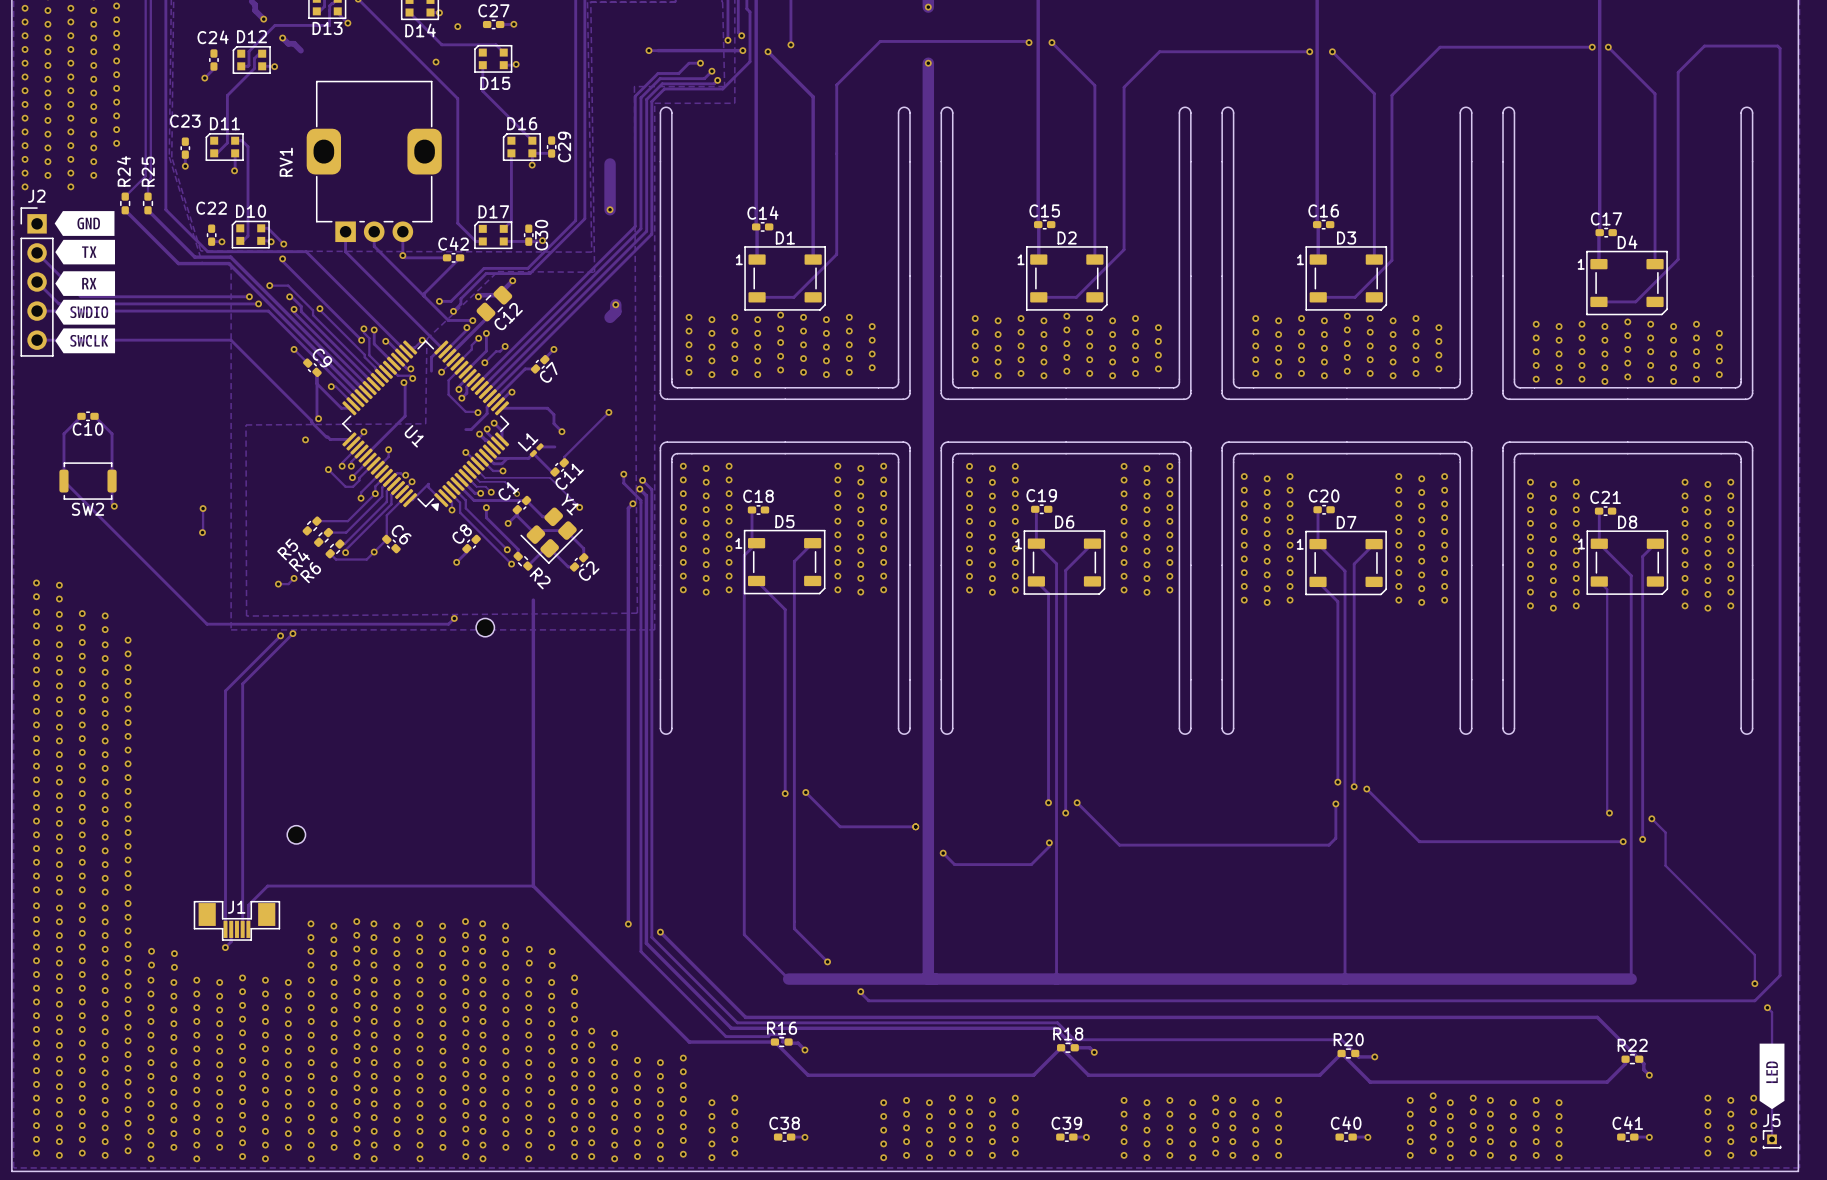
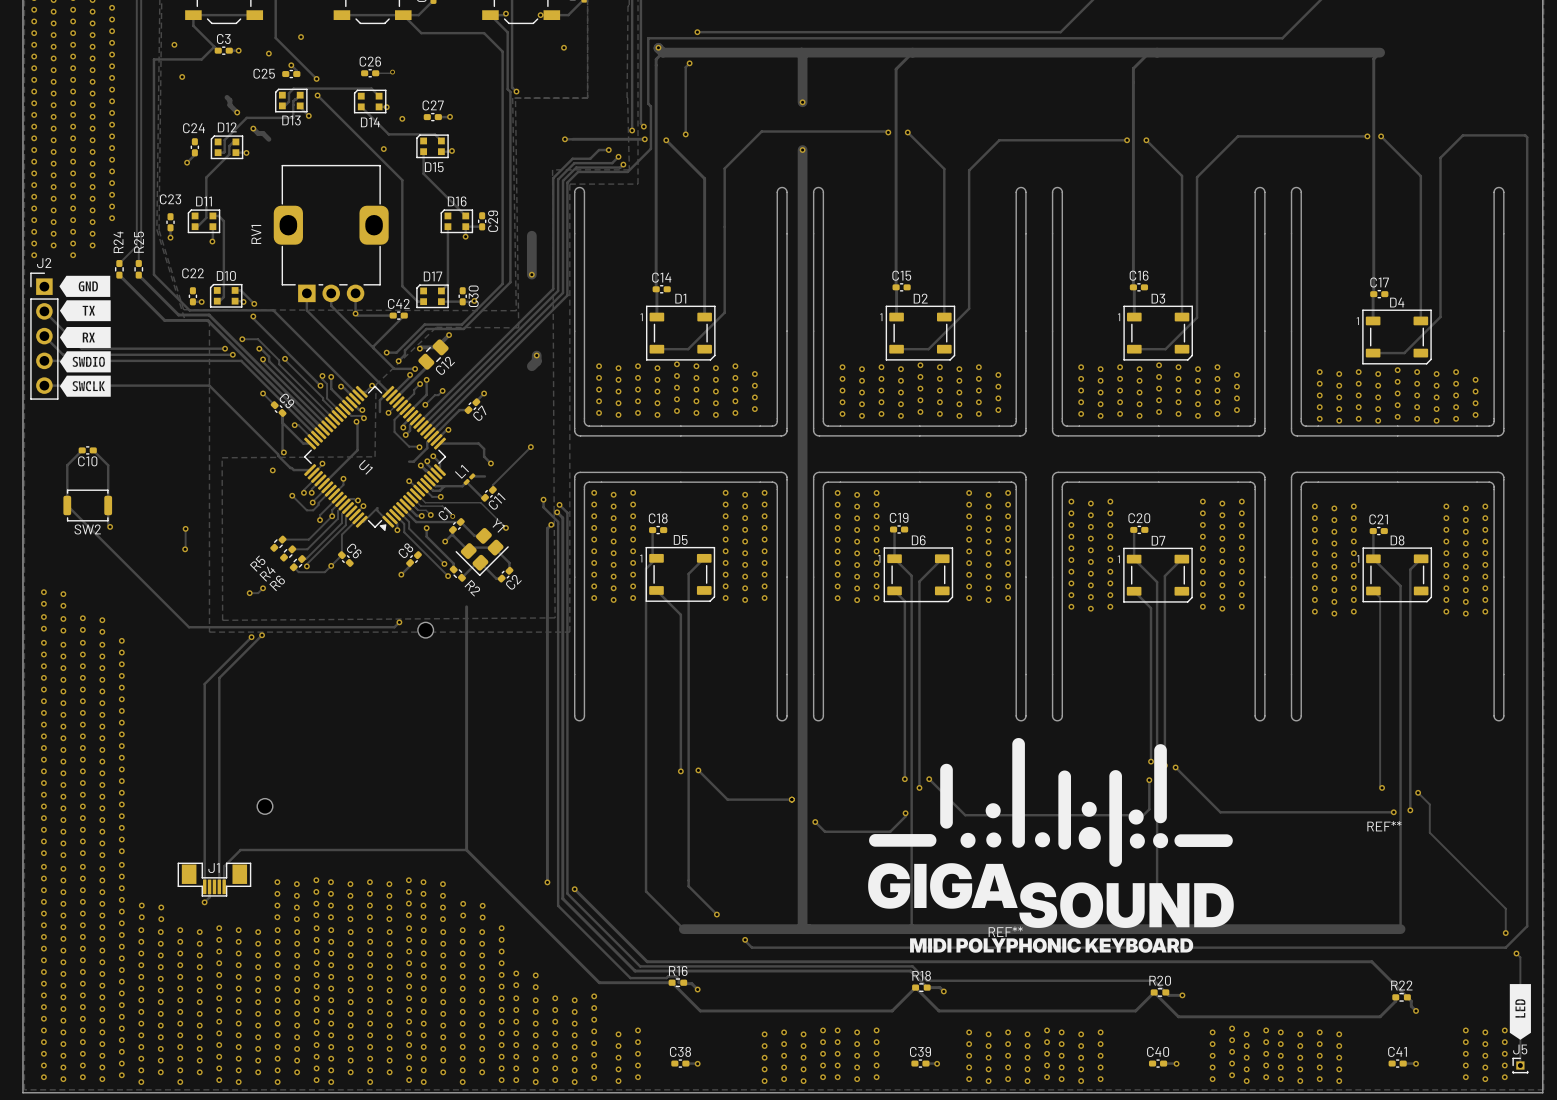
REF**: none -> (1384, 826)
REF**: none -> (1050, 845)

